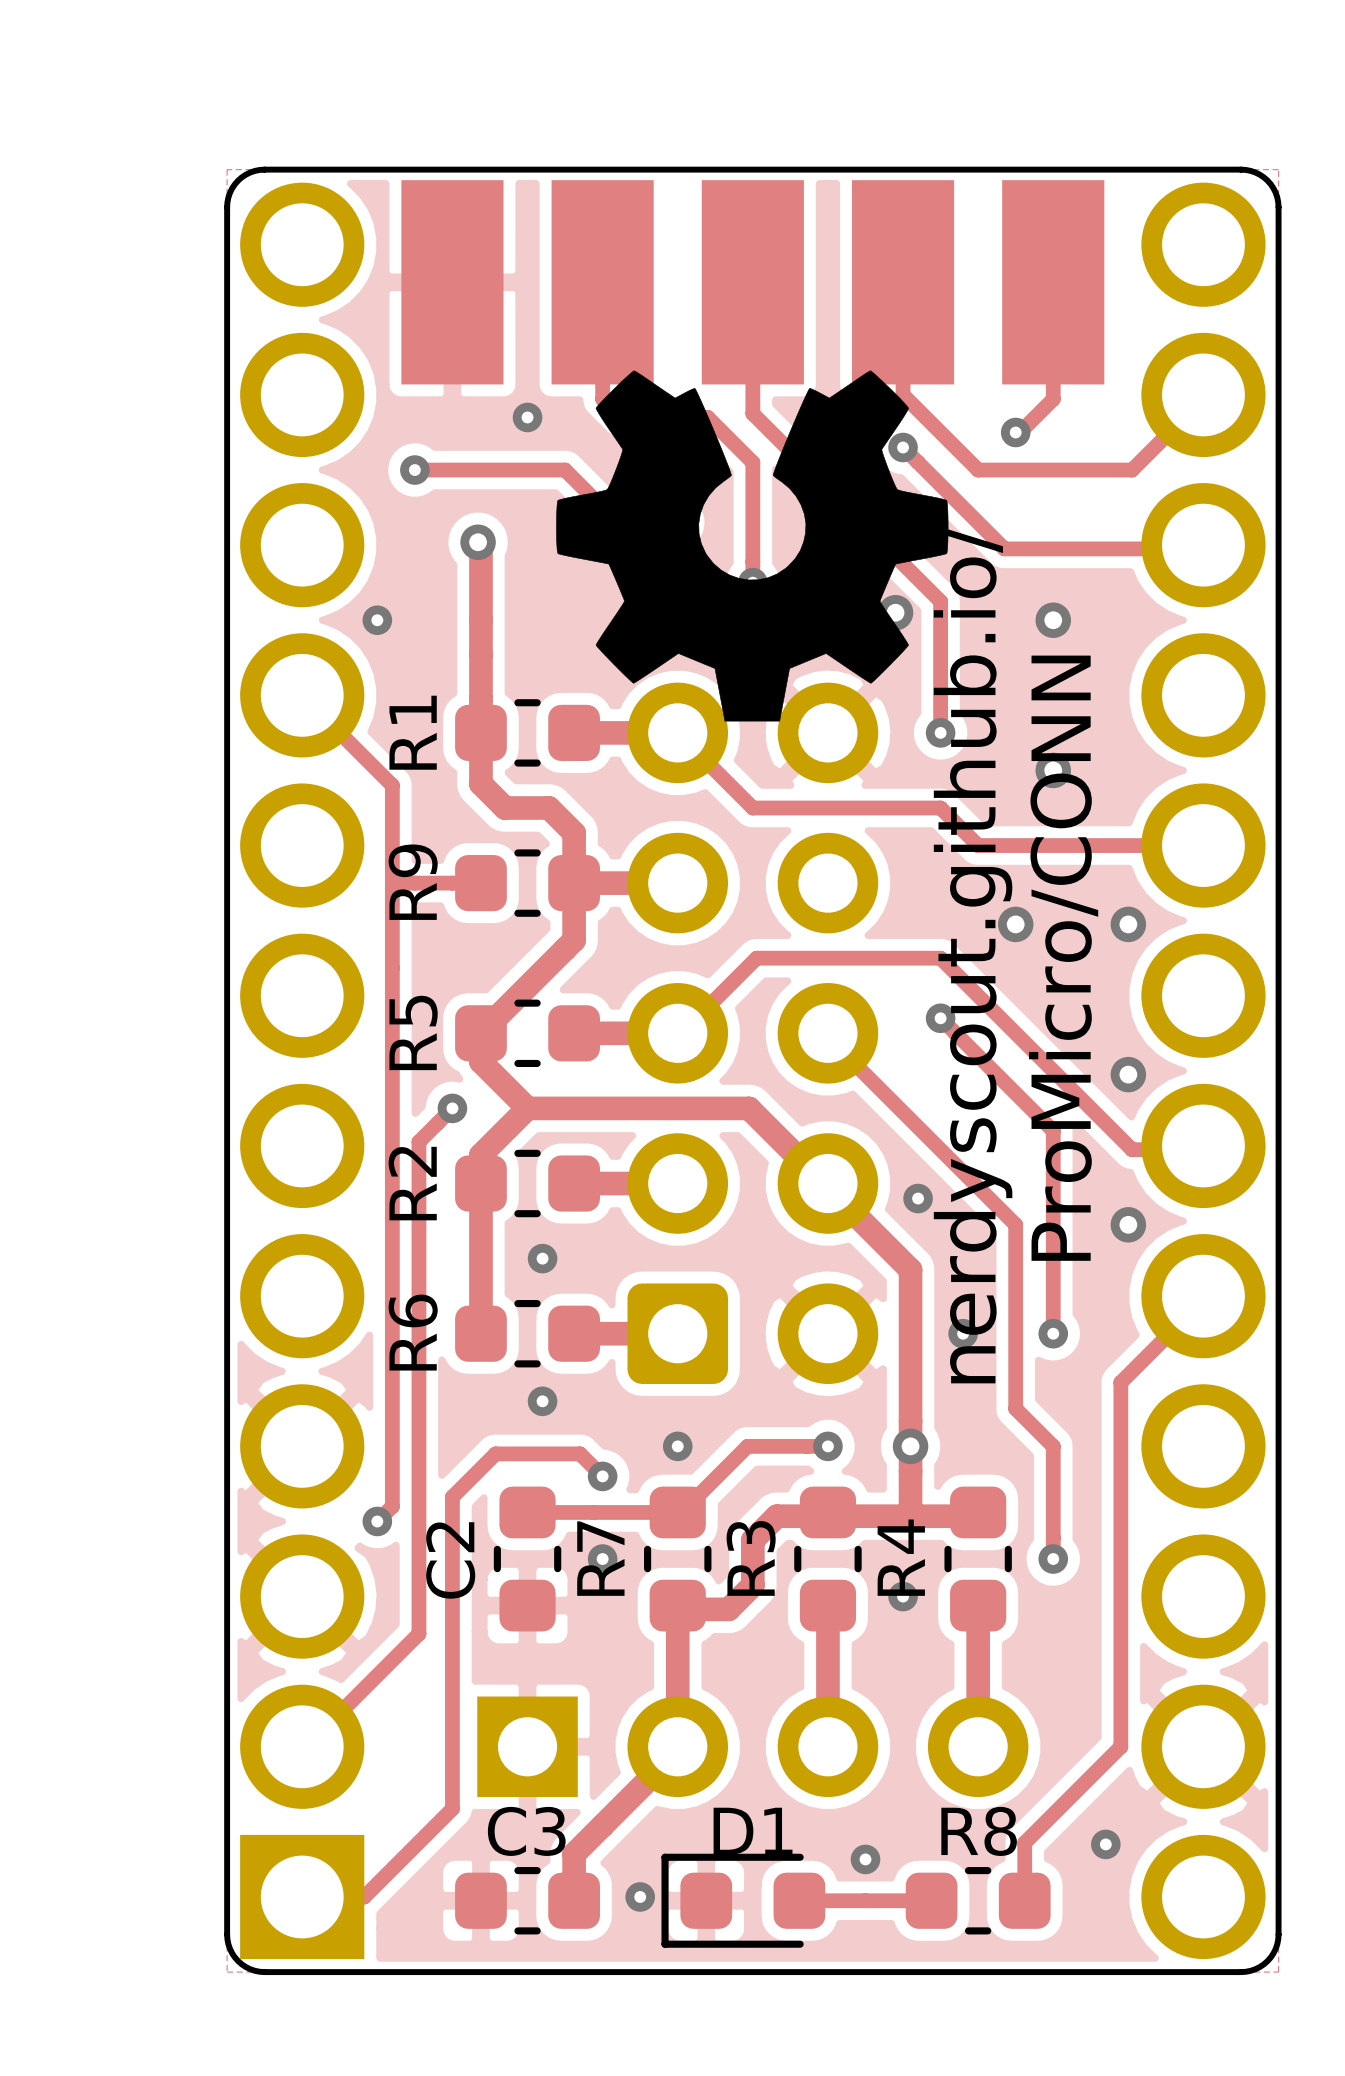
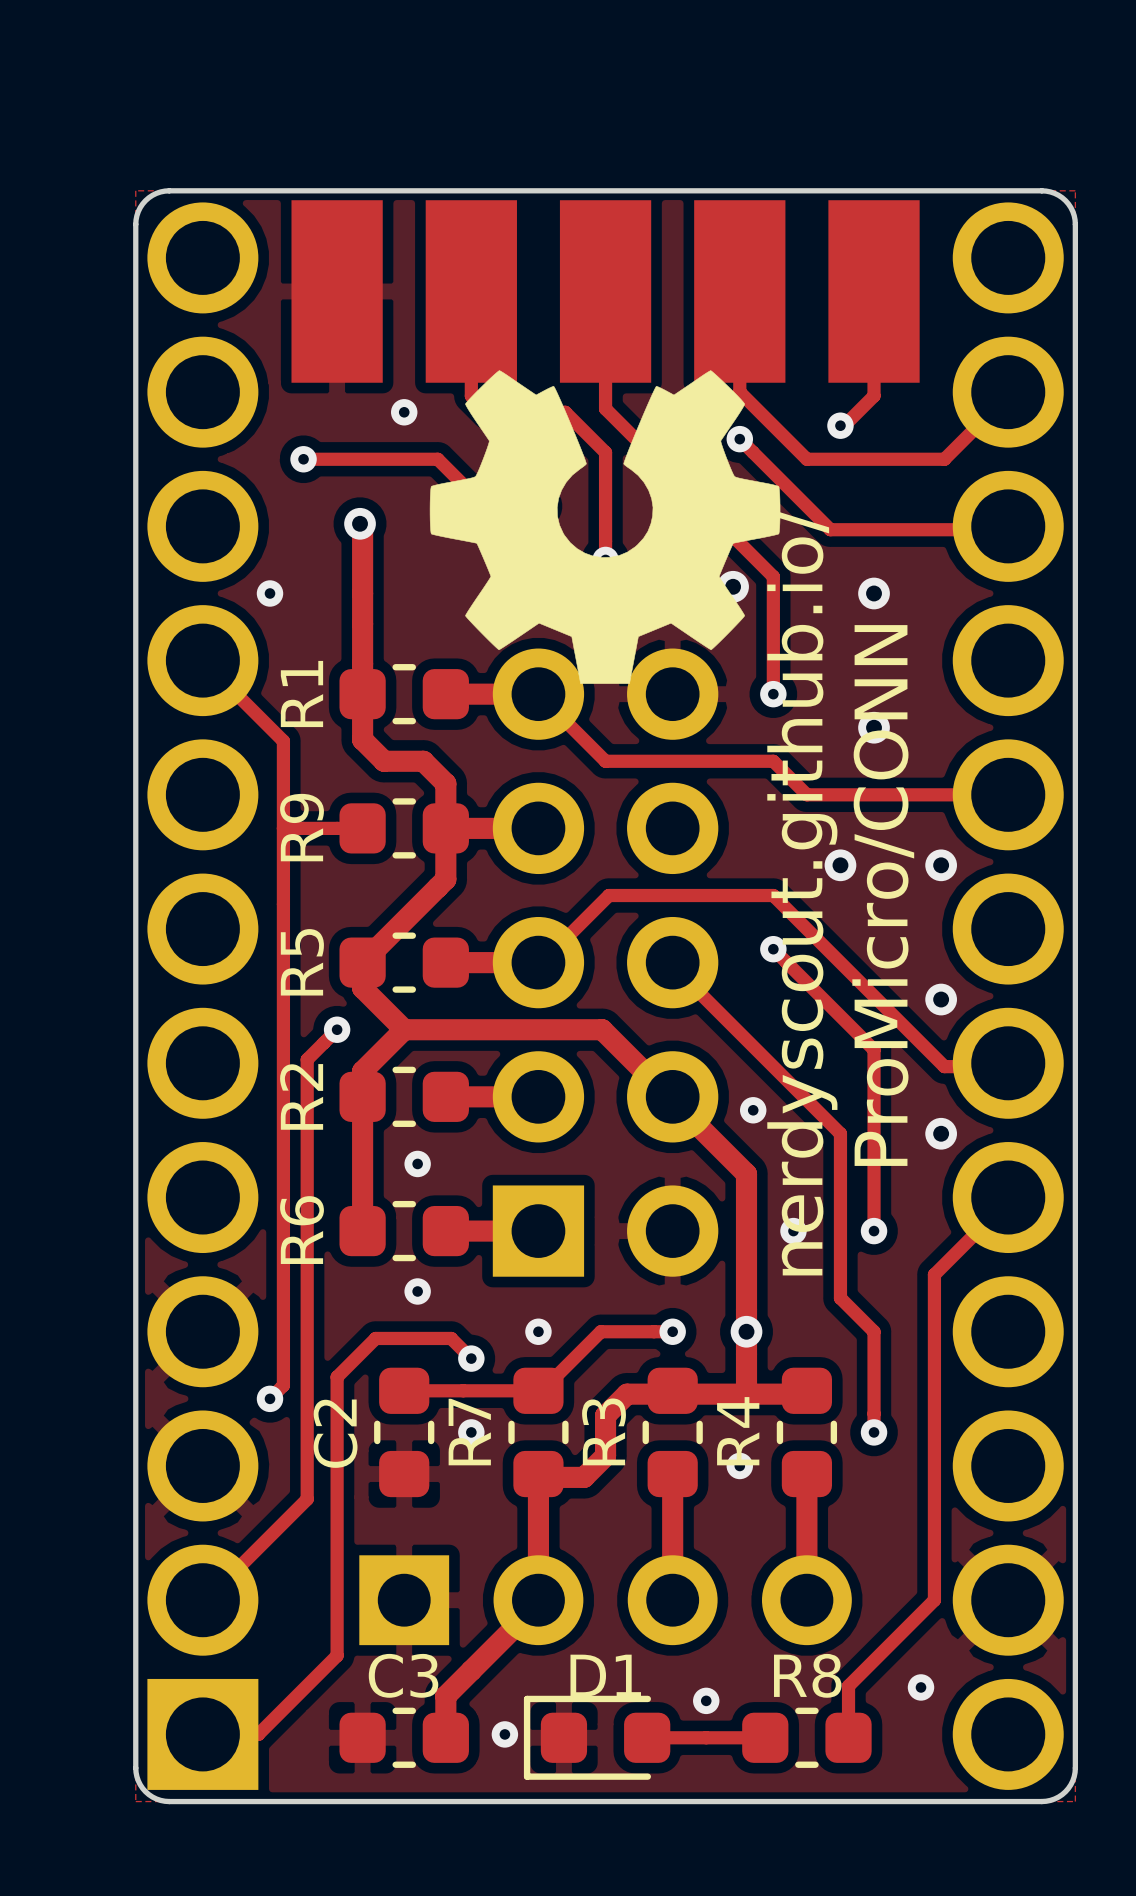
part footprint: [627, 682, 879, 1384] -> [492, 648, 719, 1277]

